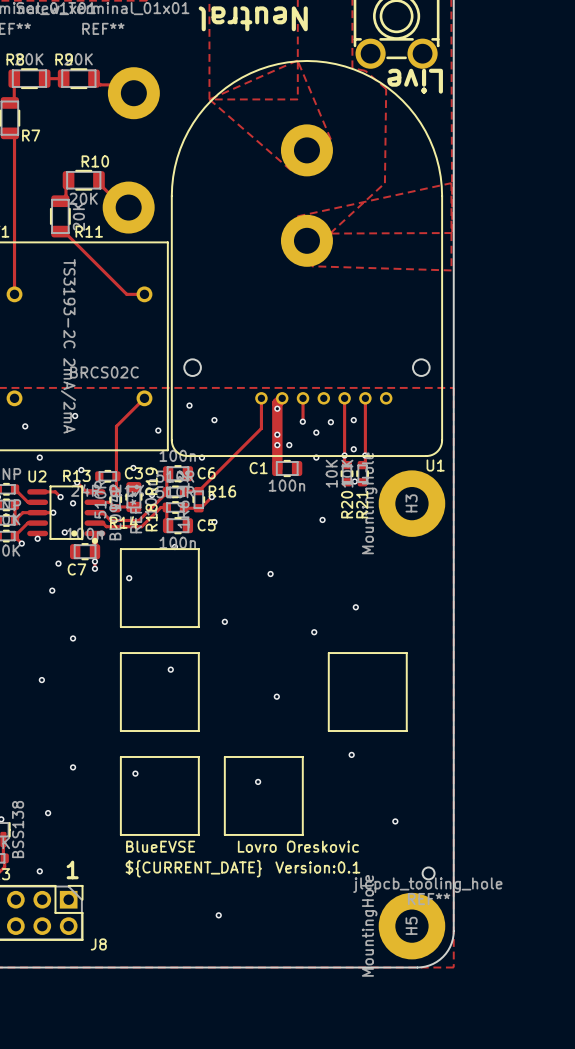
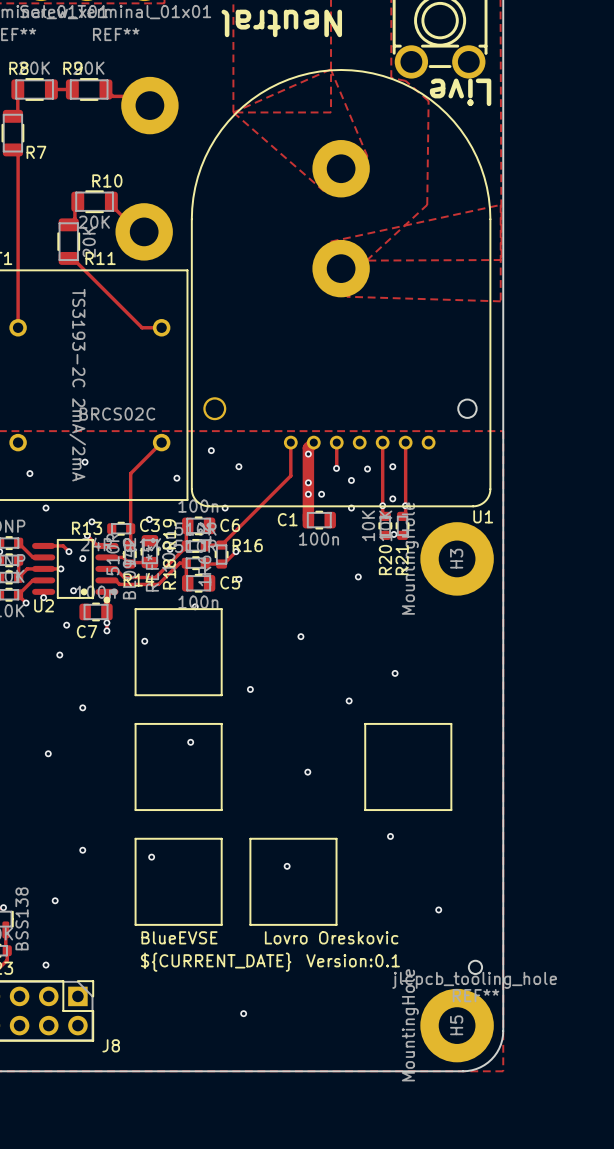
U1 footprint: [102, 60, 443, 457] -> [115, 69, 491, 507]
U2 name position: U2 (37, 476) -> U2 (44, 605)
text: 1 (72, 869) -> none

